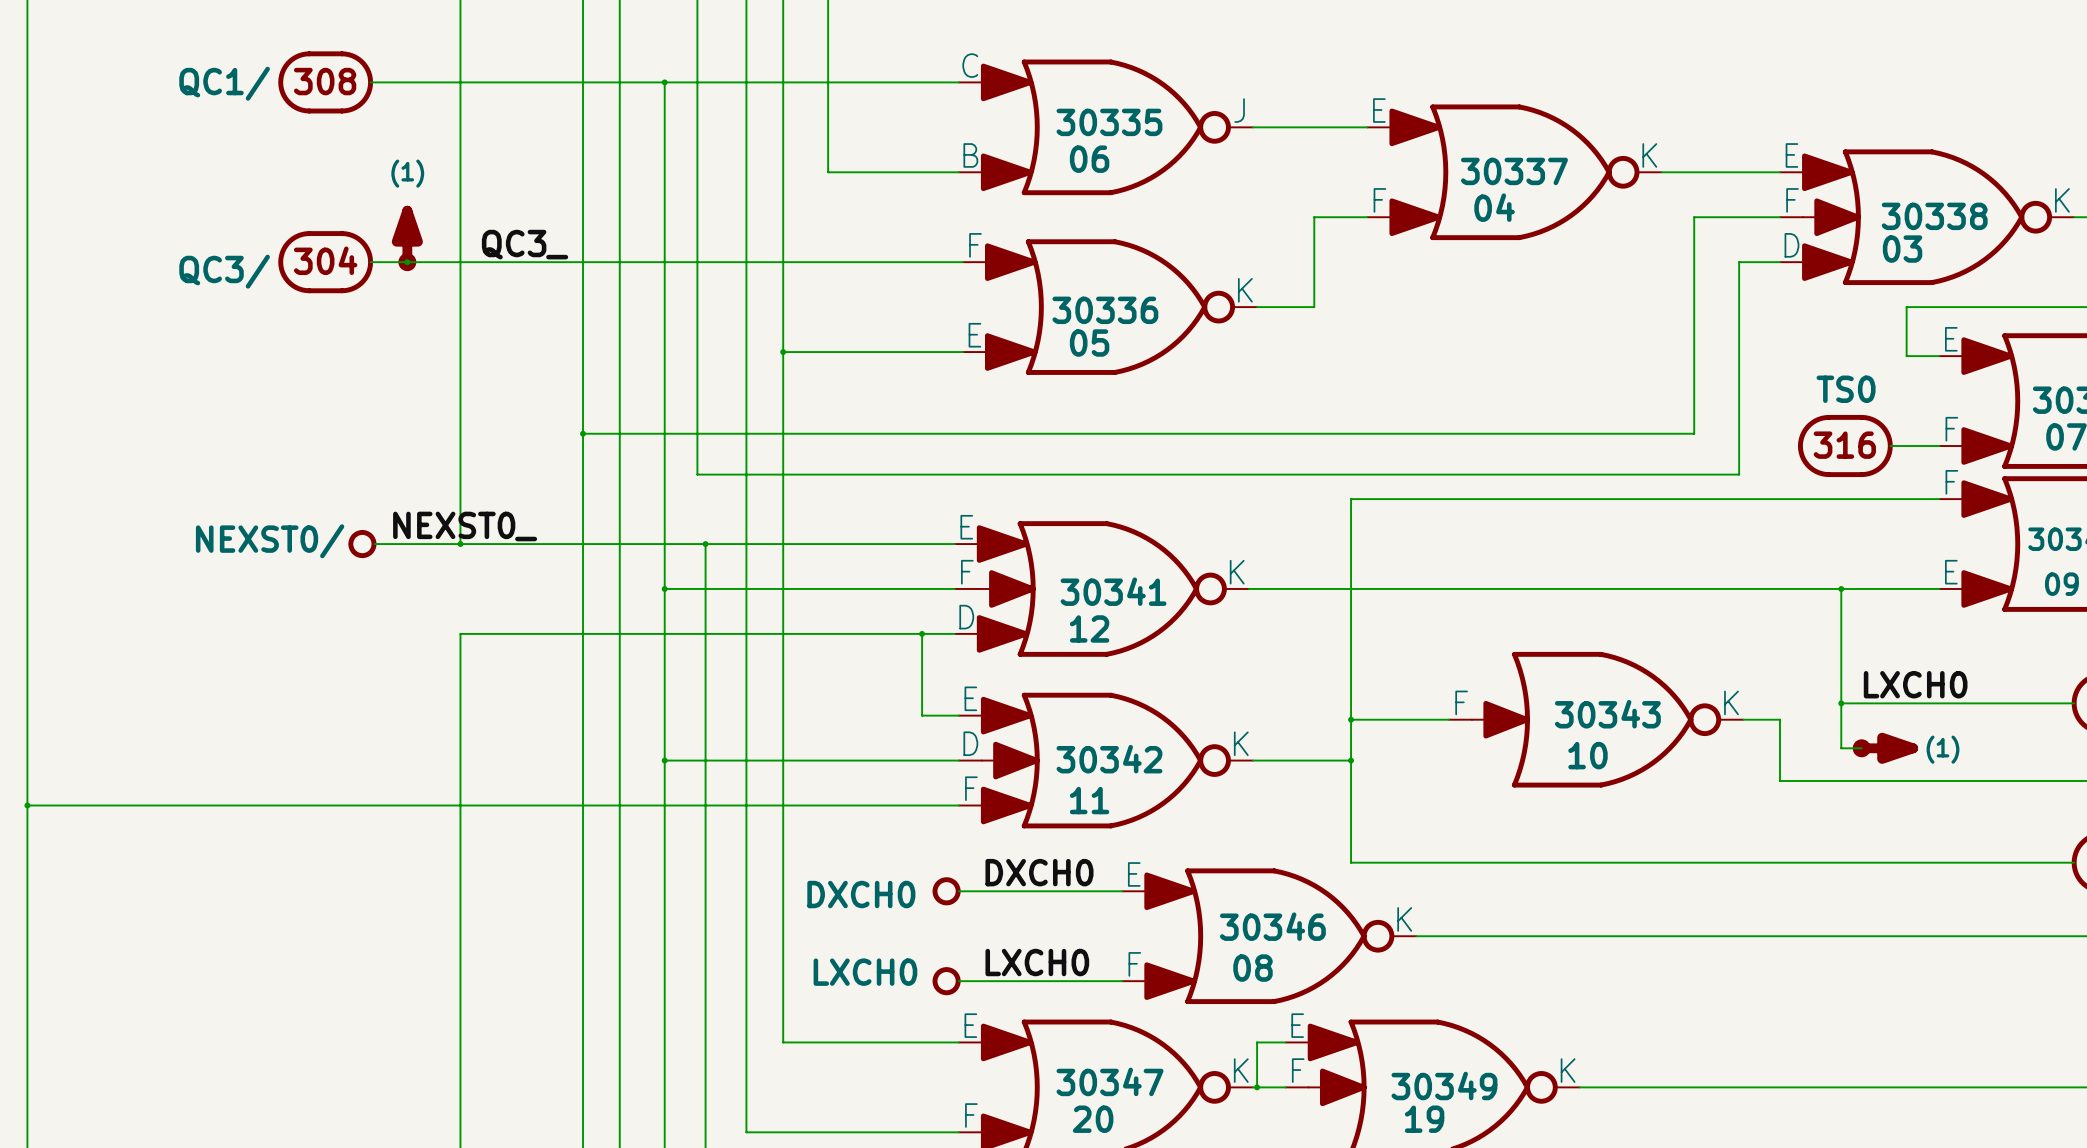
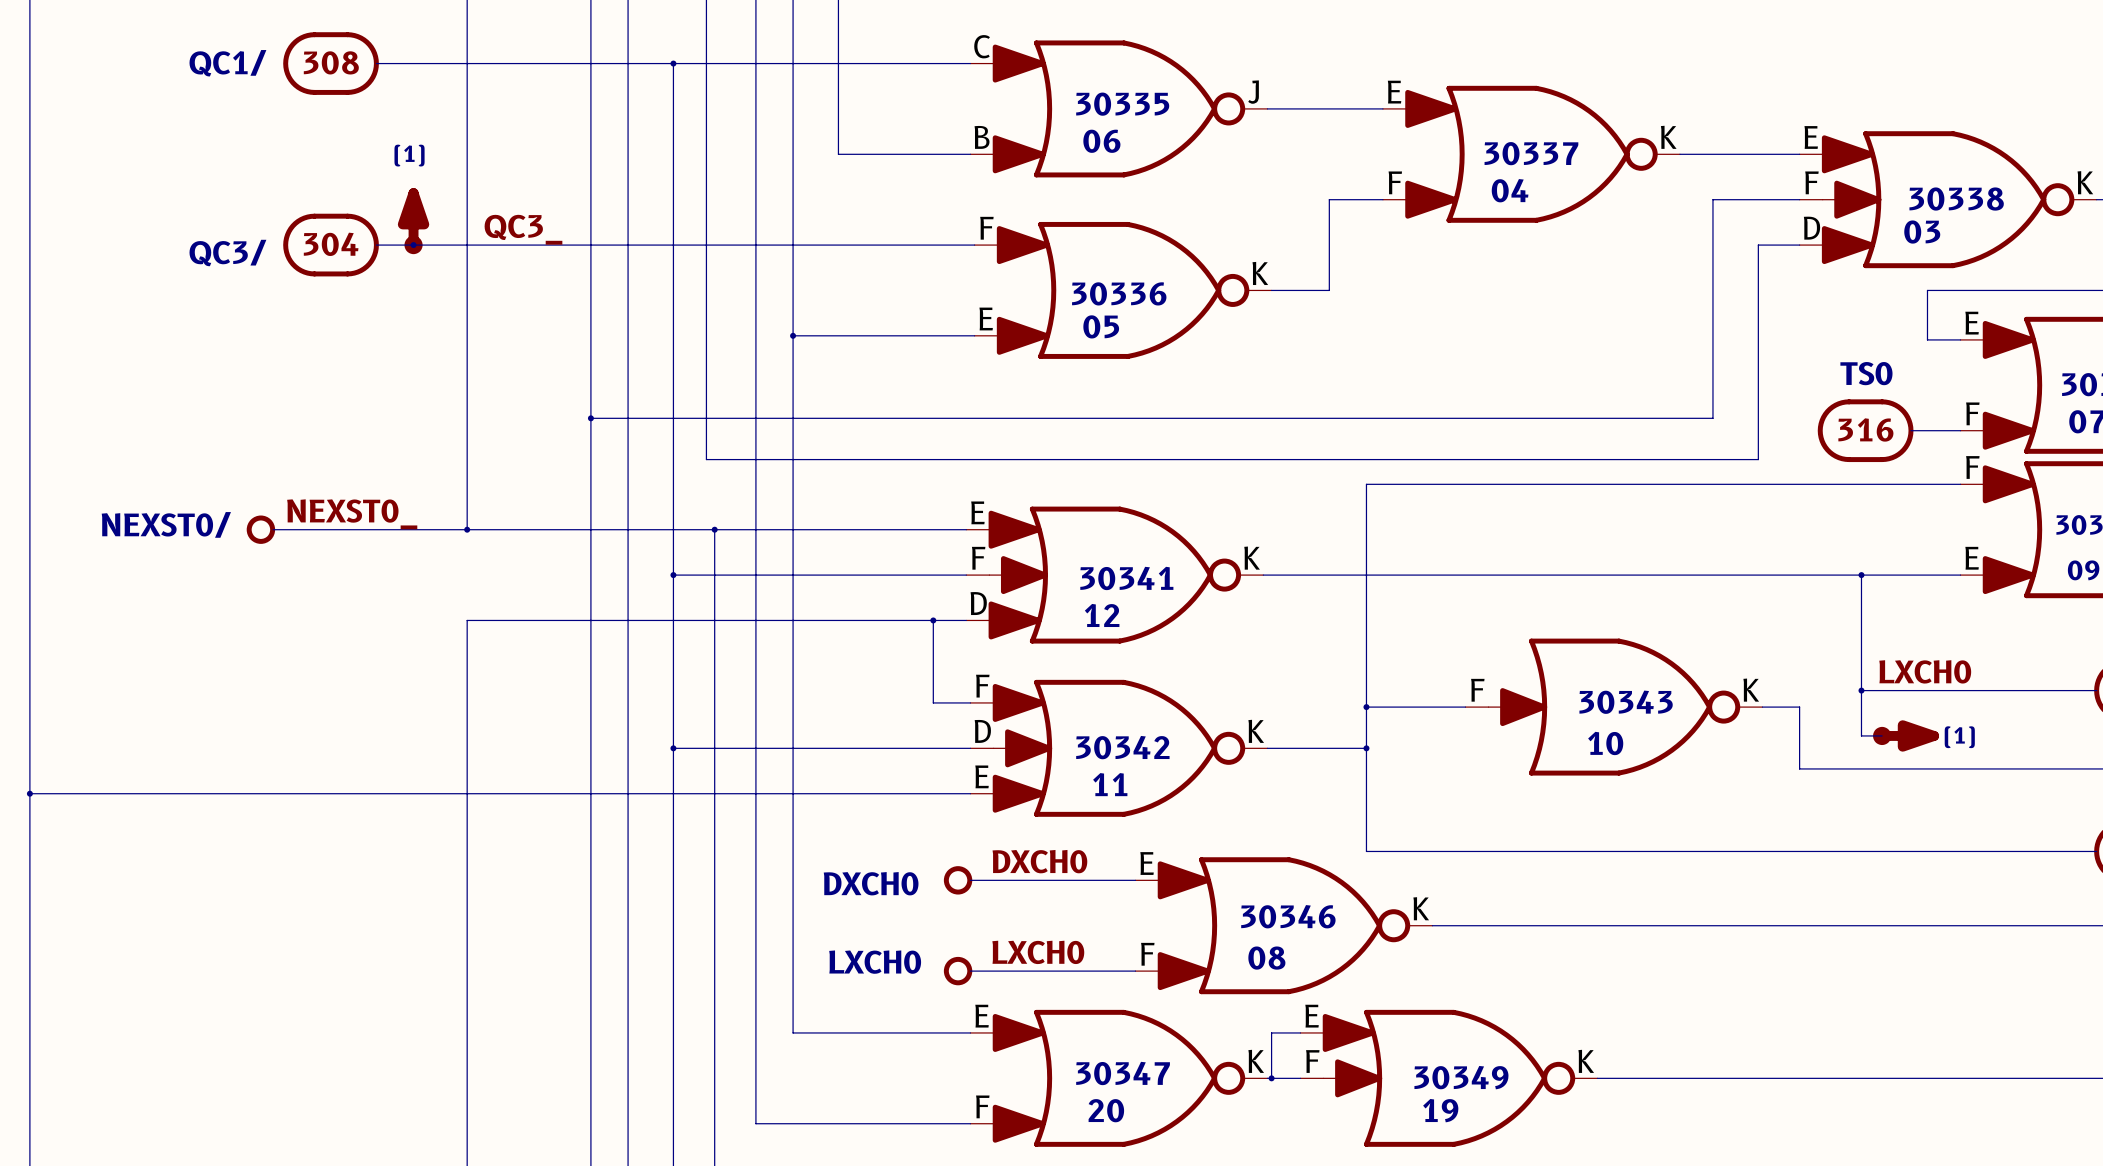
label position: NEXST0_ (465, 526) -> NEXST0_ (352, 514)
wire: none -> (273, 529) (380, 529)
part position: (362, 544) -> (260, 529)
part flip: as is (1105, 760) -> up-down (1118, 748)

